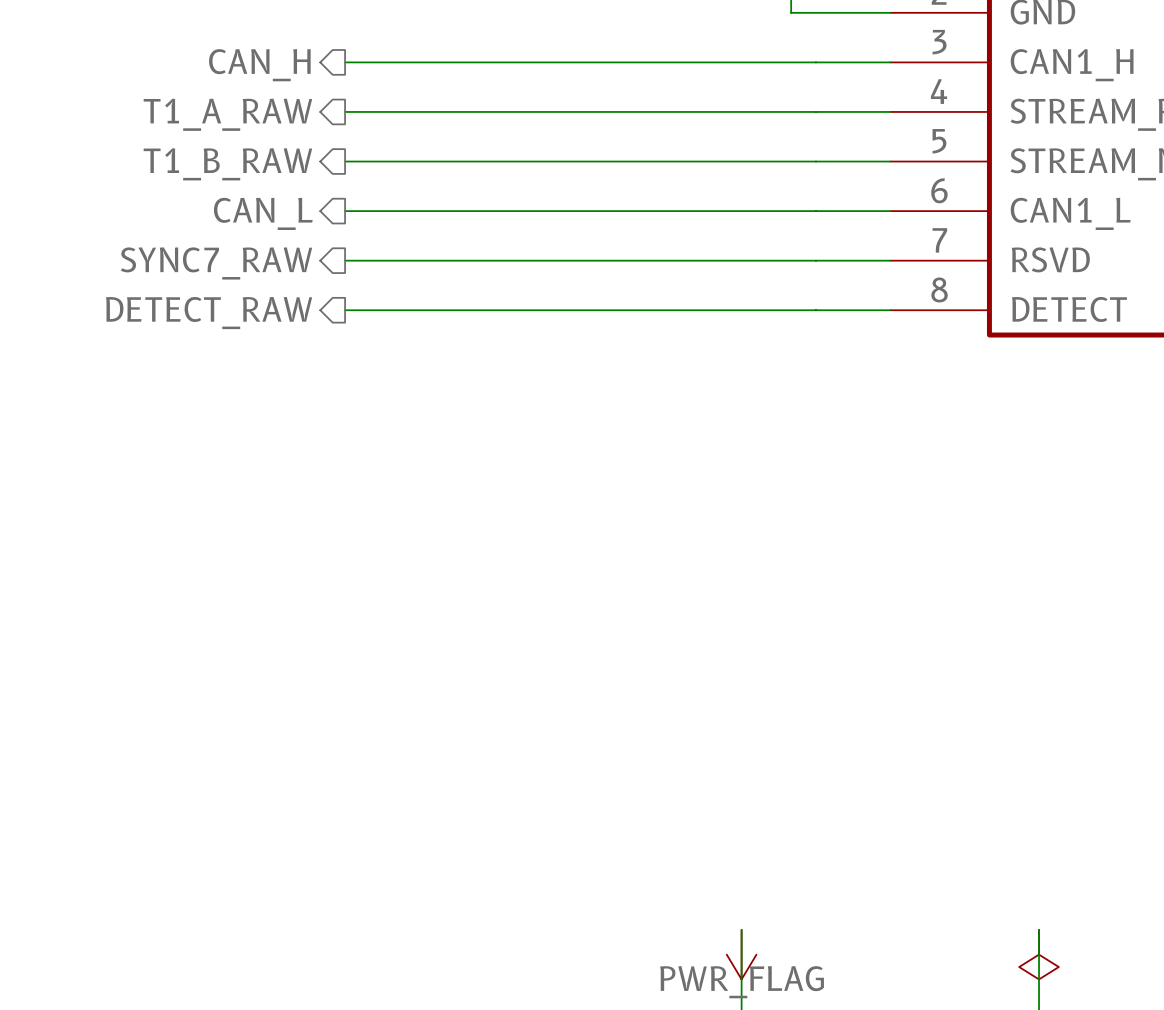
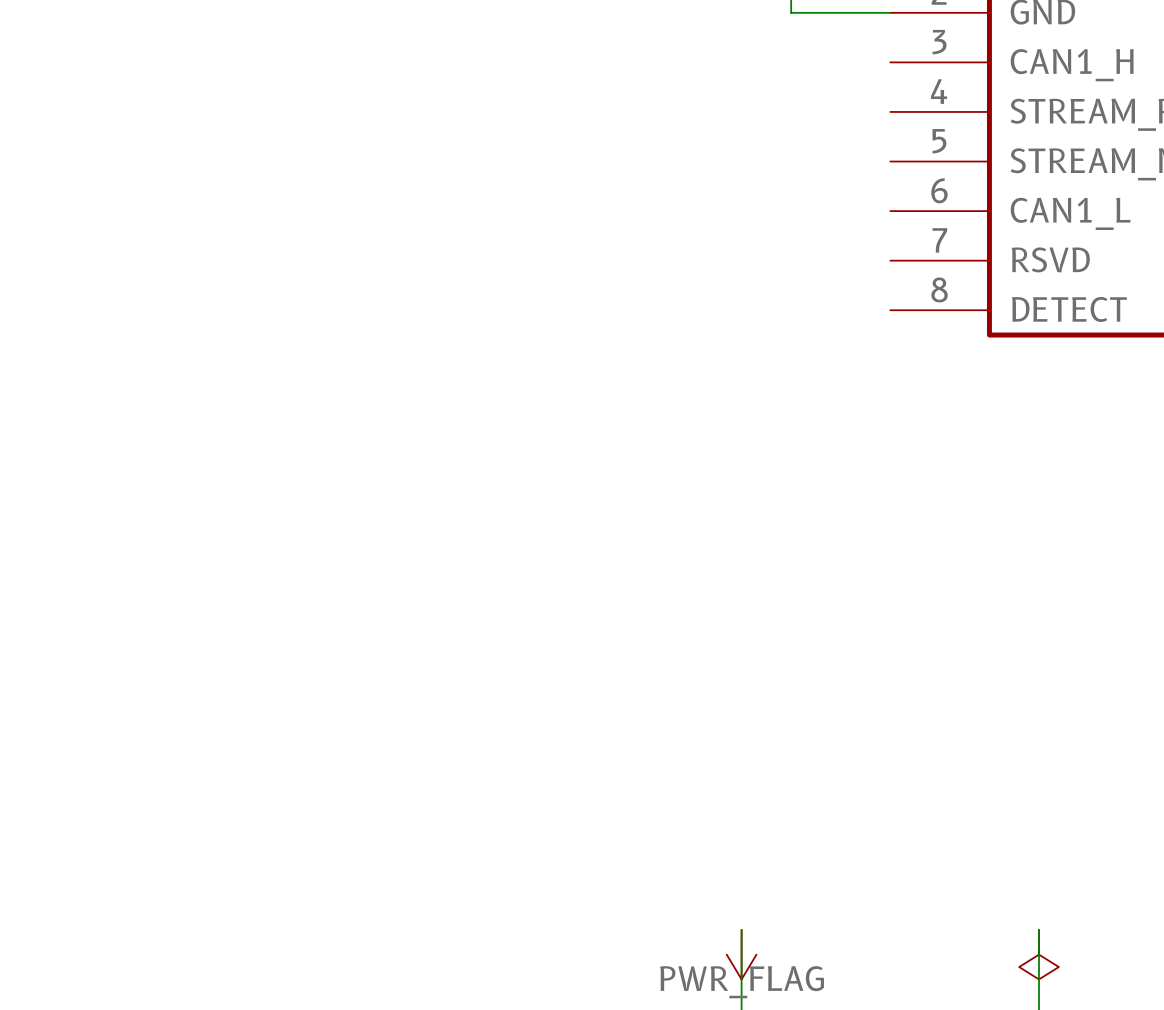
wire: (345, 62) (890, 62) -> none
hierarchical label: CAN_H (259, 65) -> none
wire: (345, 111) (890, 111) -> none
hierarchical label: T1_A_RAW (227, 114) -> none
wire: (345, 161) (890, 161) -> none
hierarchical label: T1_B_RAW (227, 164) -> none
wire: (345, 211) (890, 211) -> none
hierarchical label: CAN_L (263, 213) -> none
wire: (345, 260) (890, 260) -> none
hierarchical label: SYNC7_RAW (216, 263) -> none
wire: (345, 310) (890, 310) -> none
hierarchical label: DETECT_RAW (209, 313) -> none

